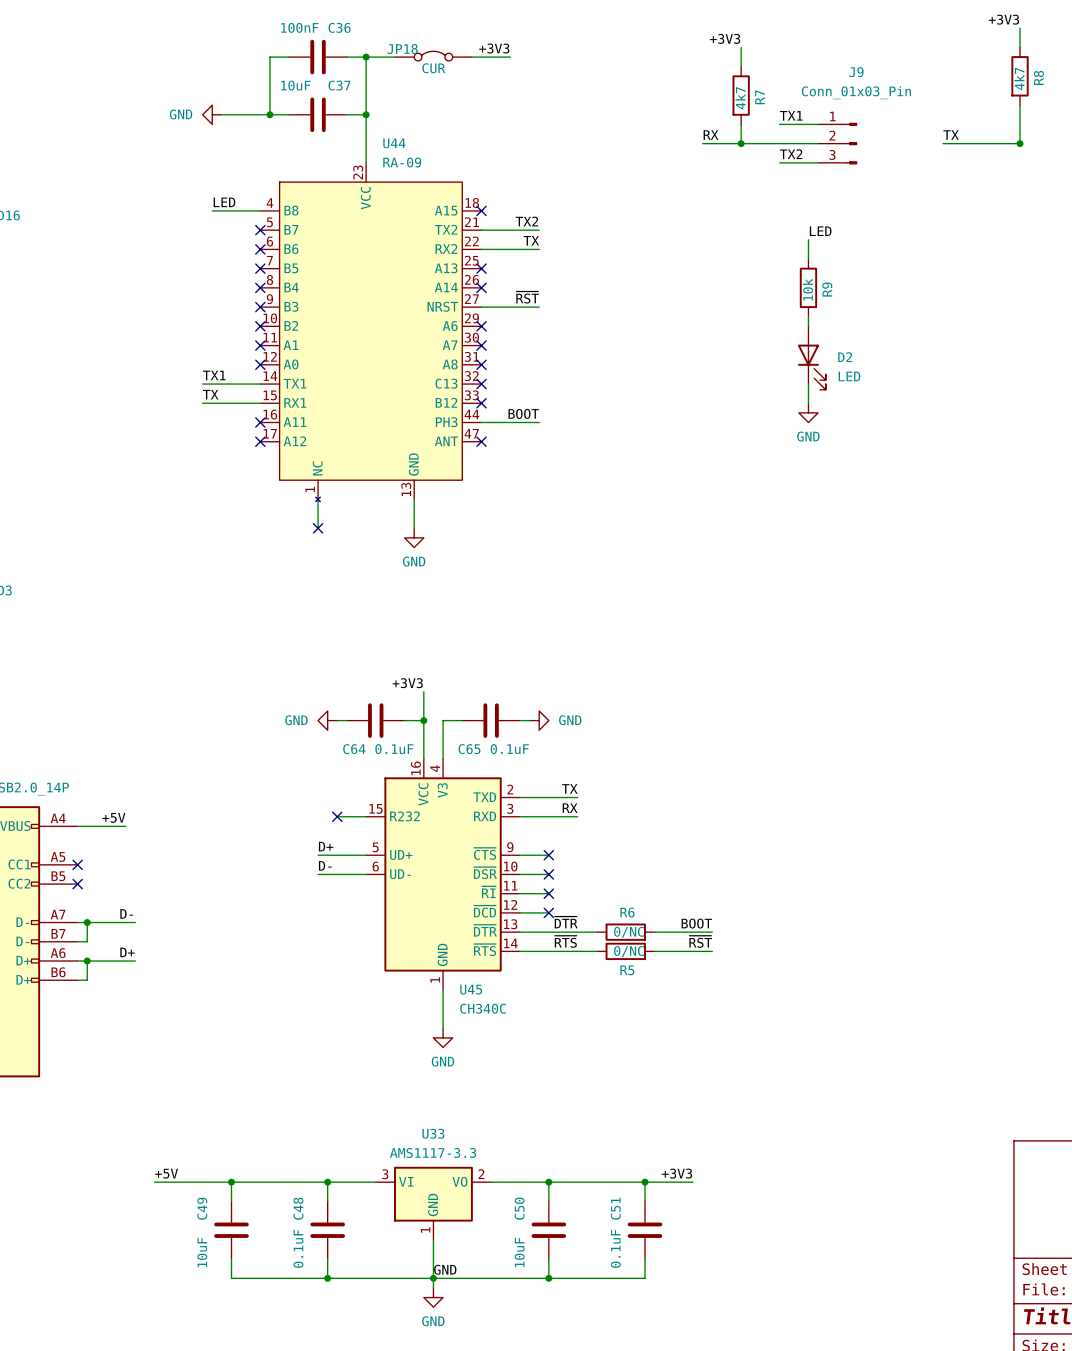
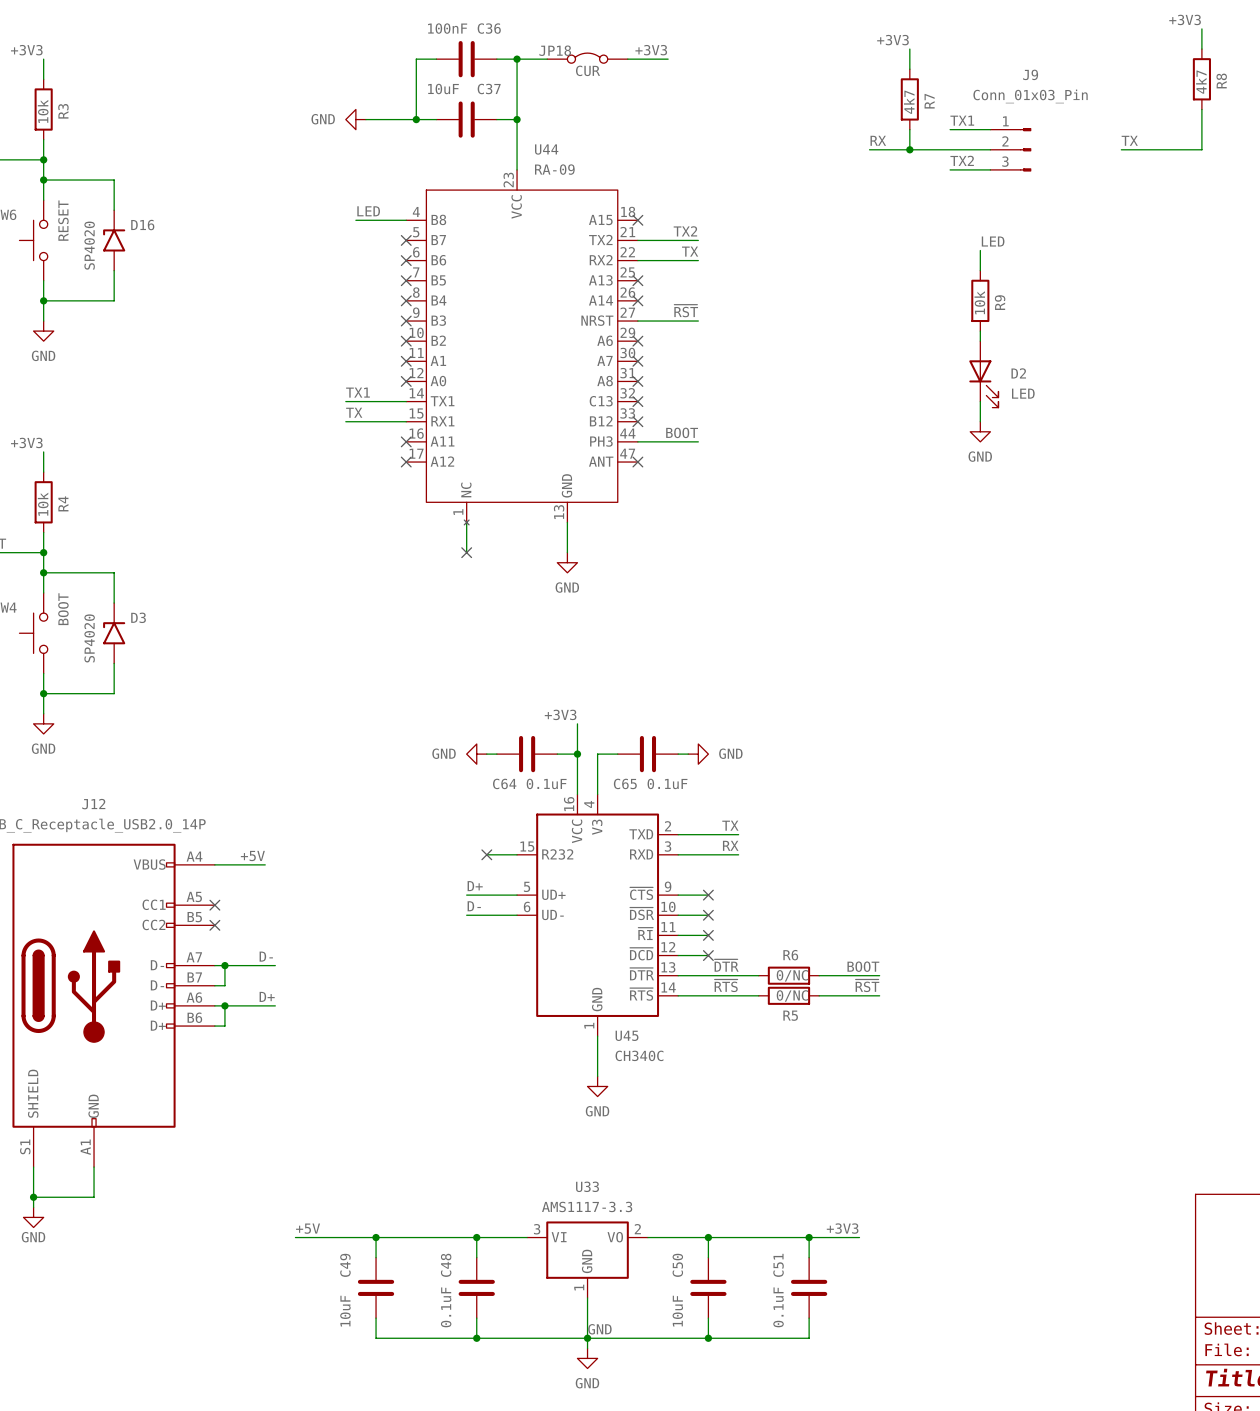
junction: (1020, 143) -> none

